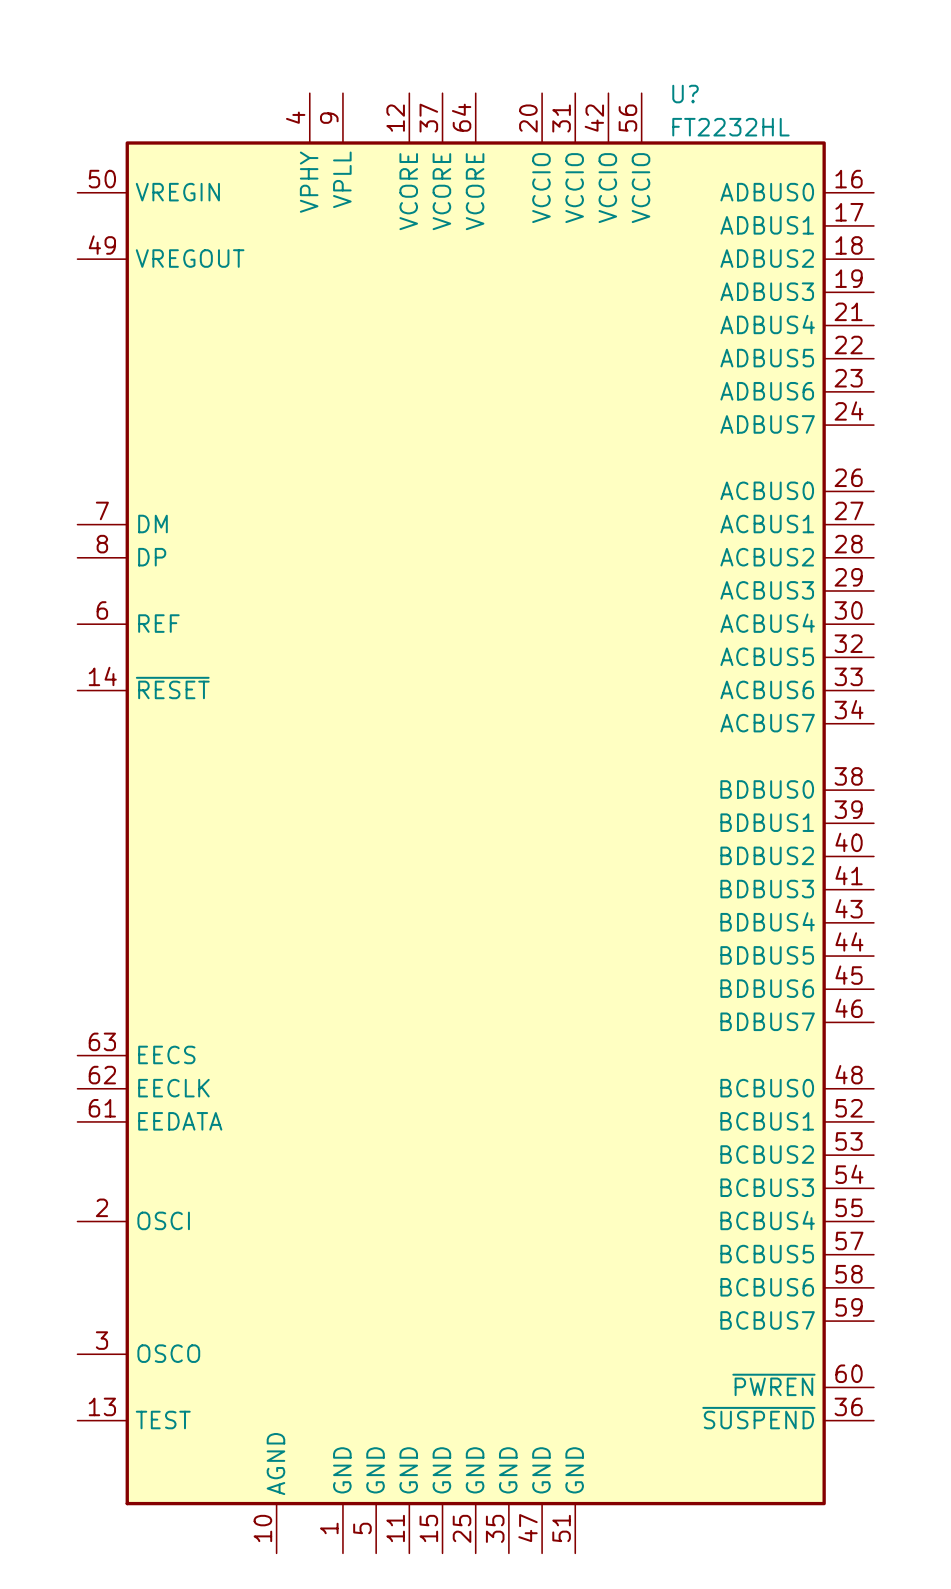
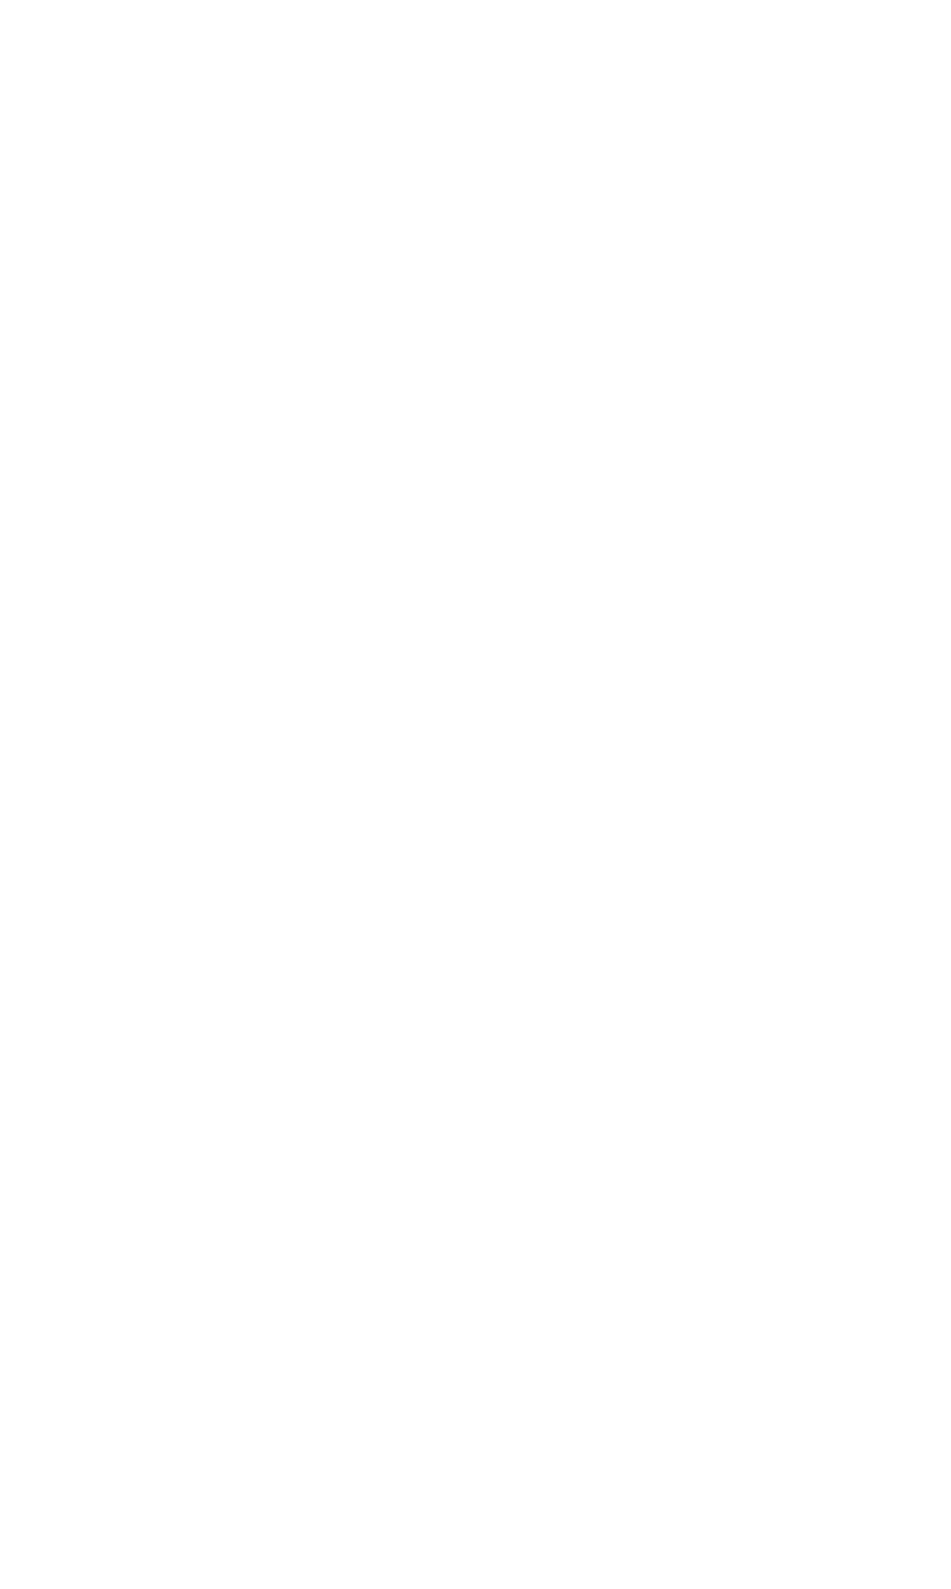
U?: FT2232HL (475, 823) -> none

